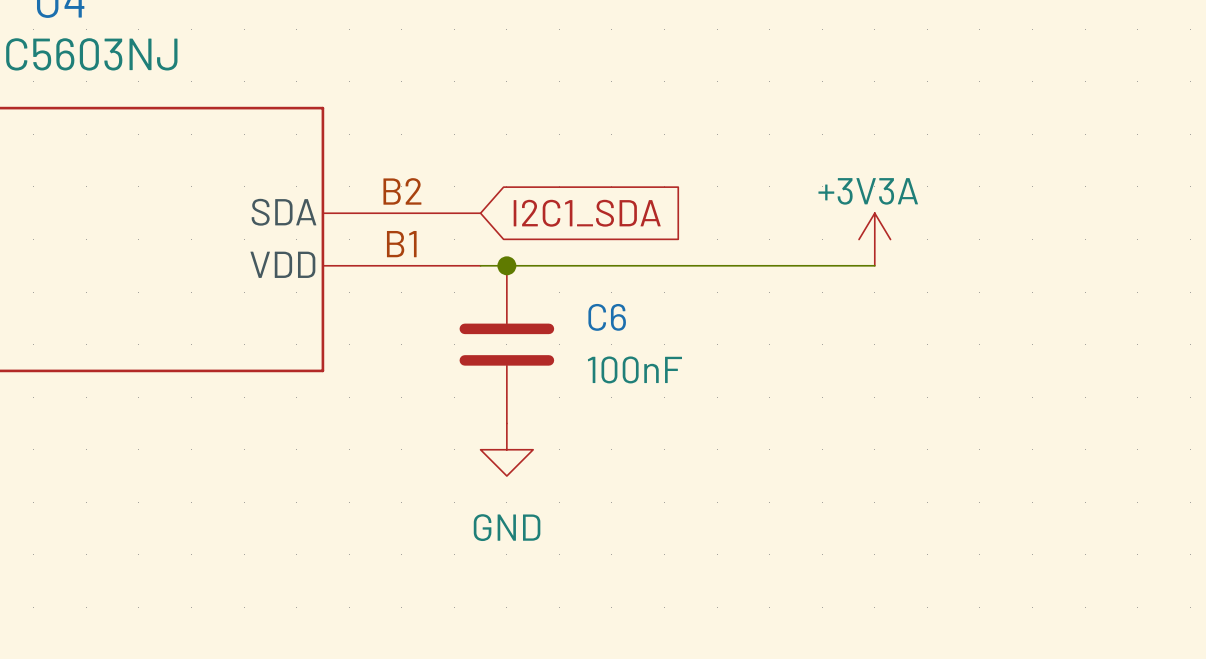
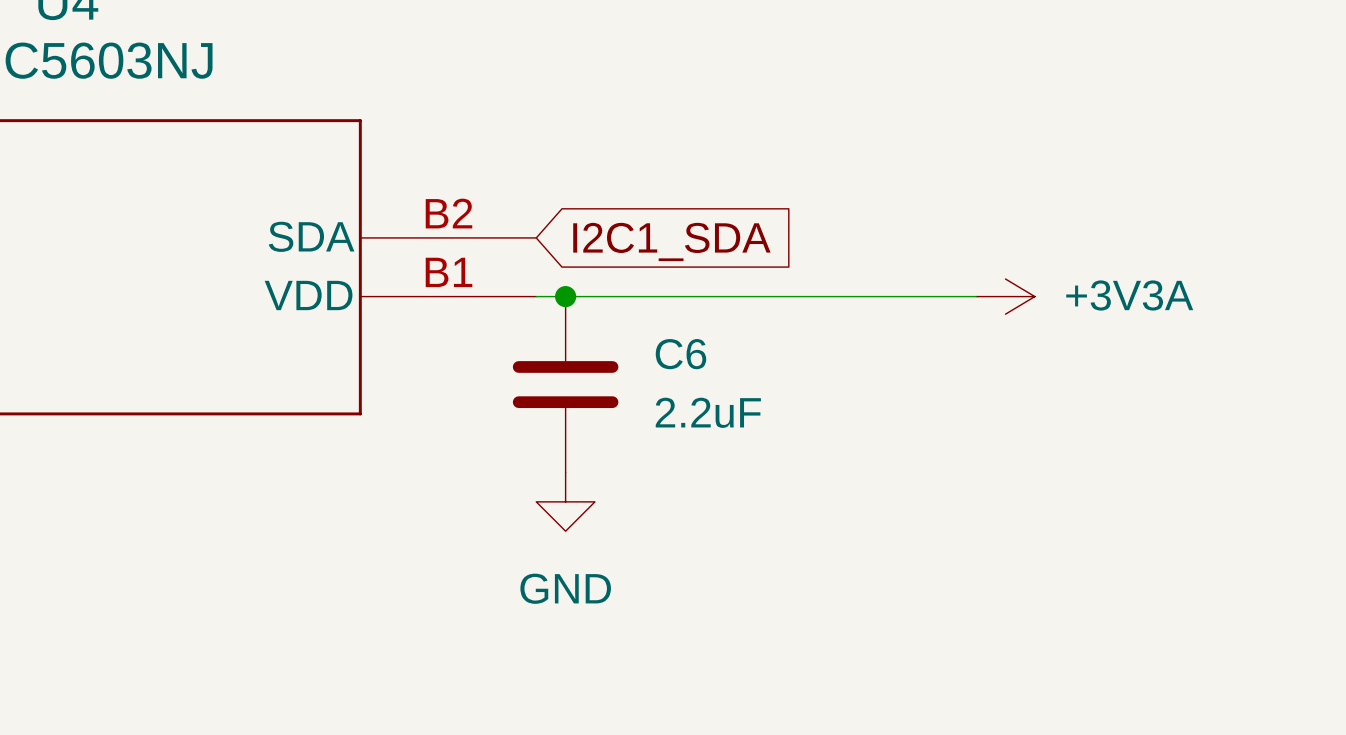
power symbol text position: +3V3A (868, 191) -> +3V3A (1129, 295)
power symbol rotation: 0° (874, 239) -> 90° clockwise (1005, 296)
power symbol position: +3V3A (874, 239) -> +3V3A (1005, 296)
C6 value: 100nF (634, 369) -> 2.2uF (708, 412)

